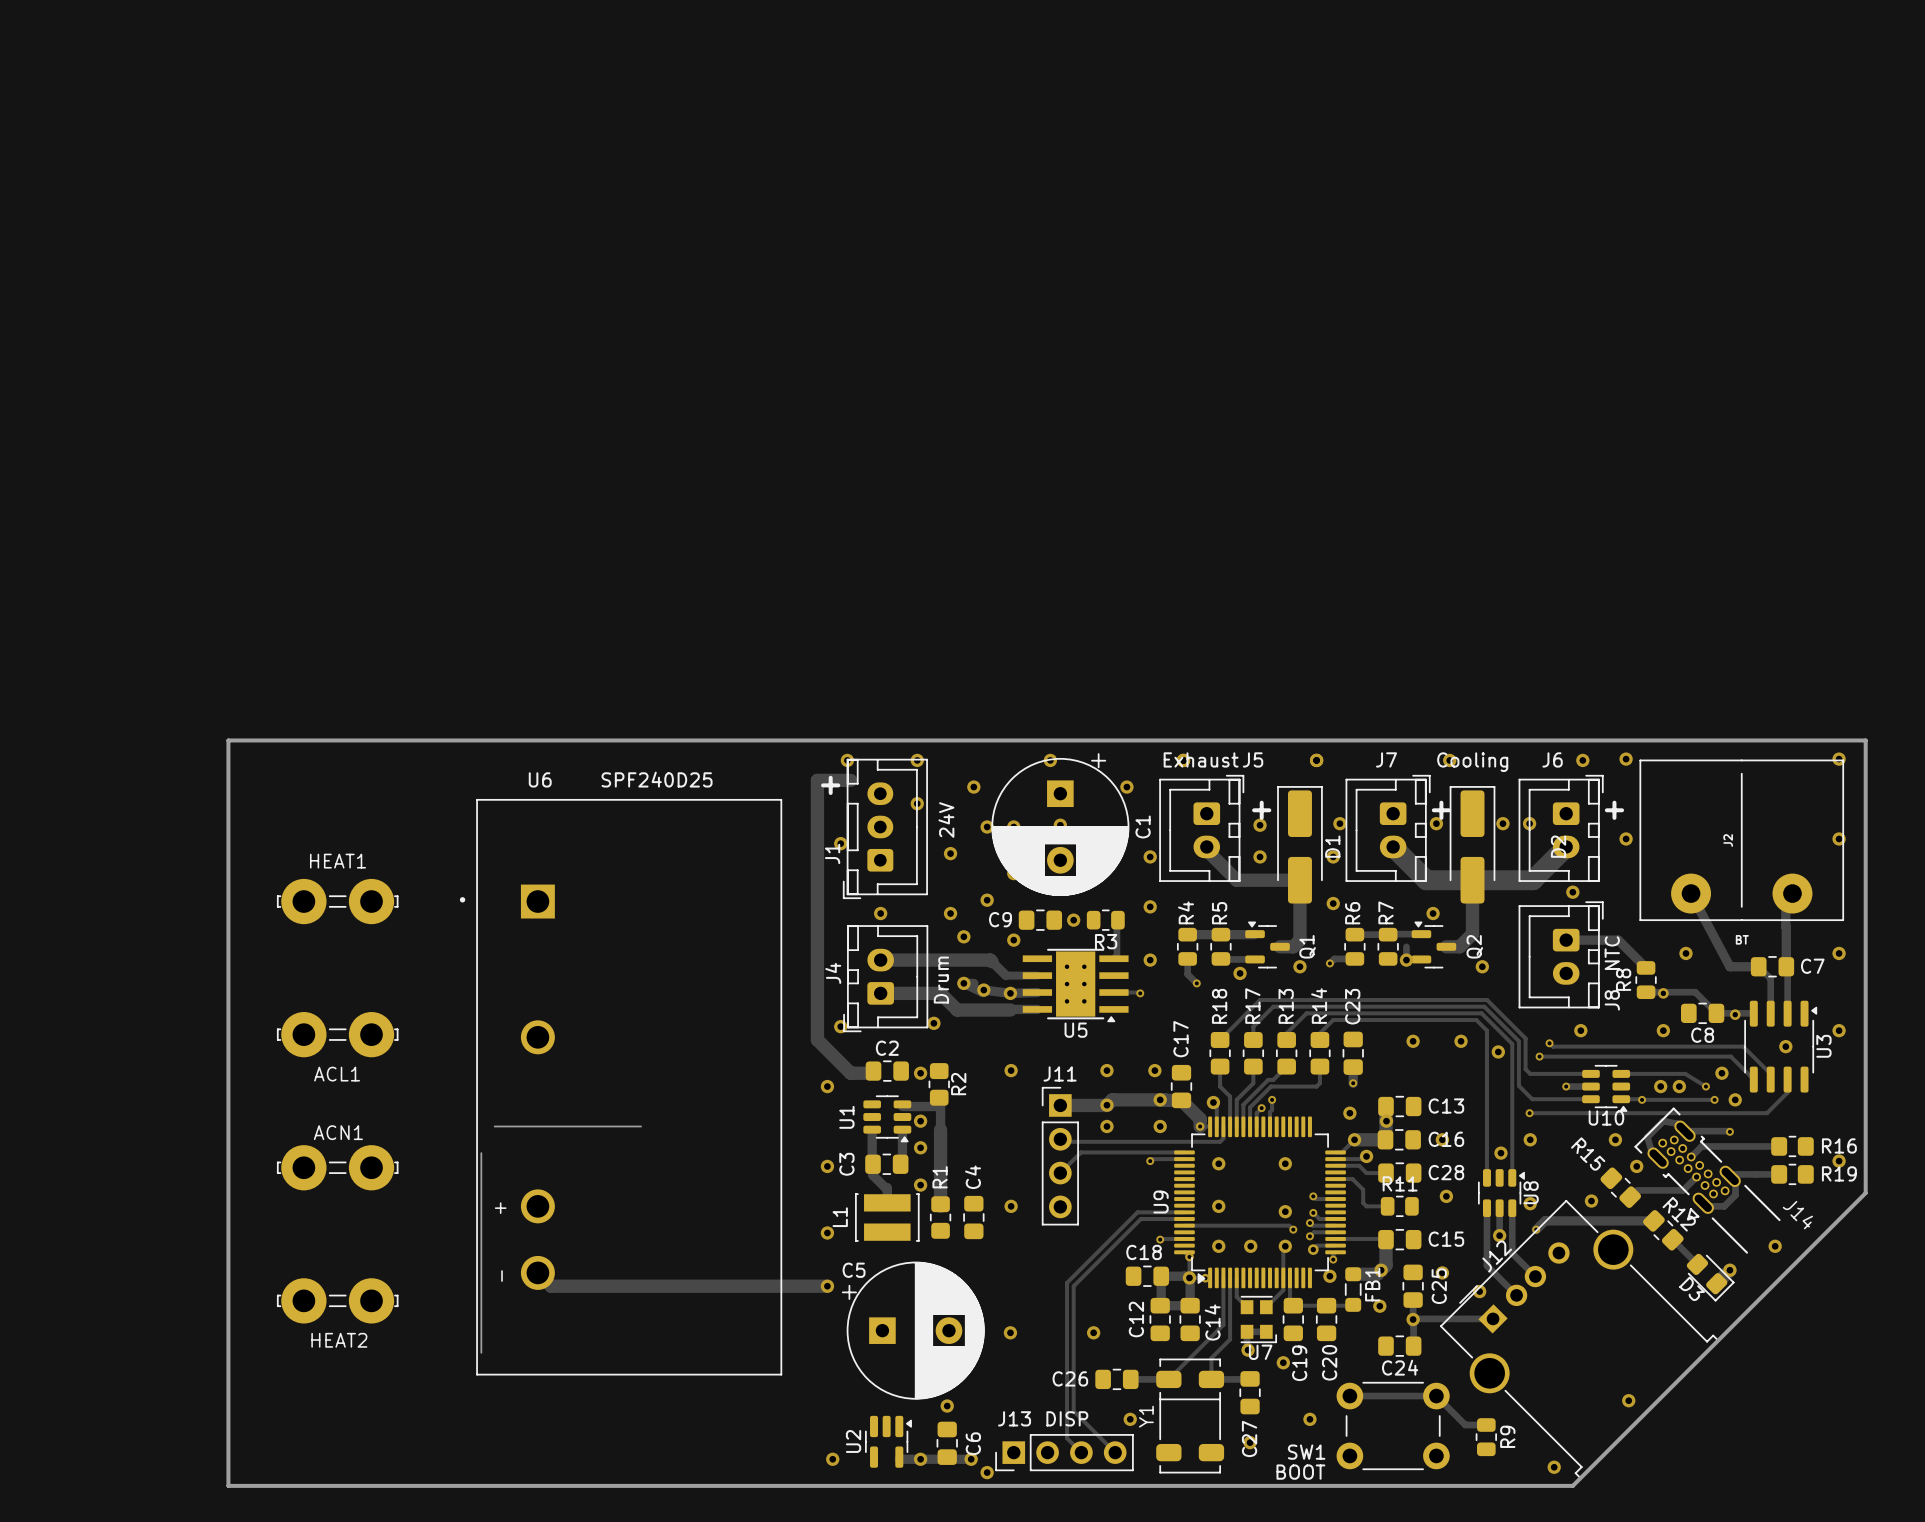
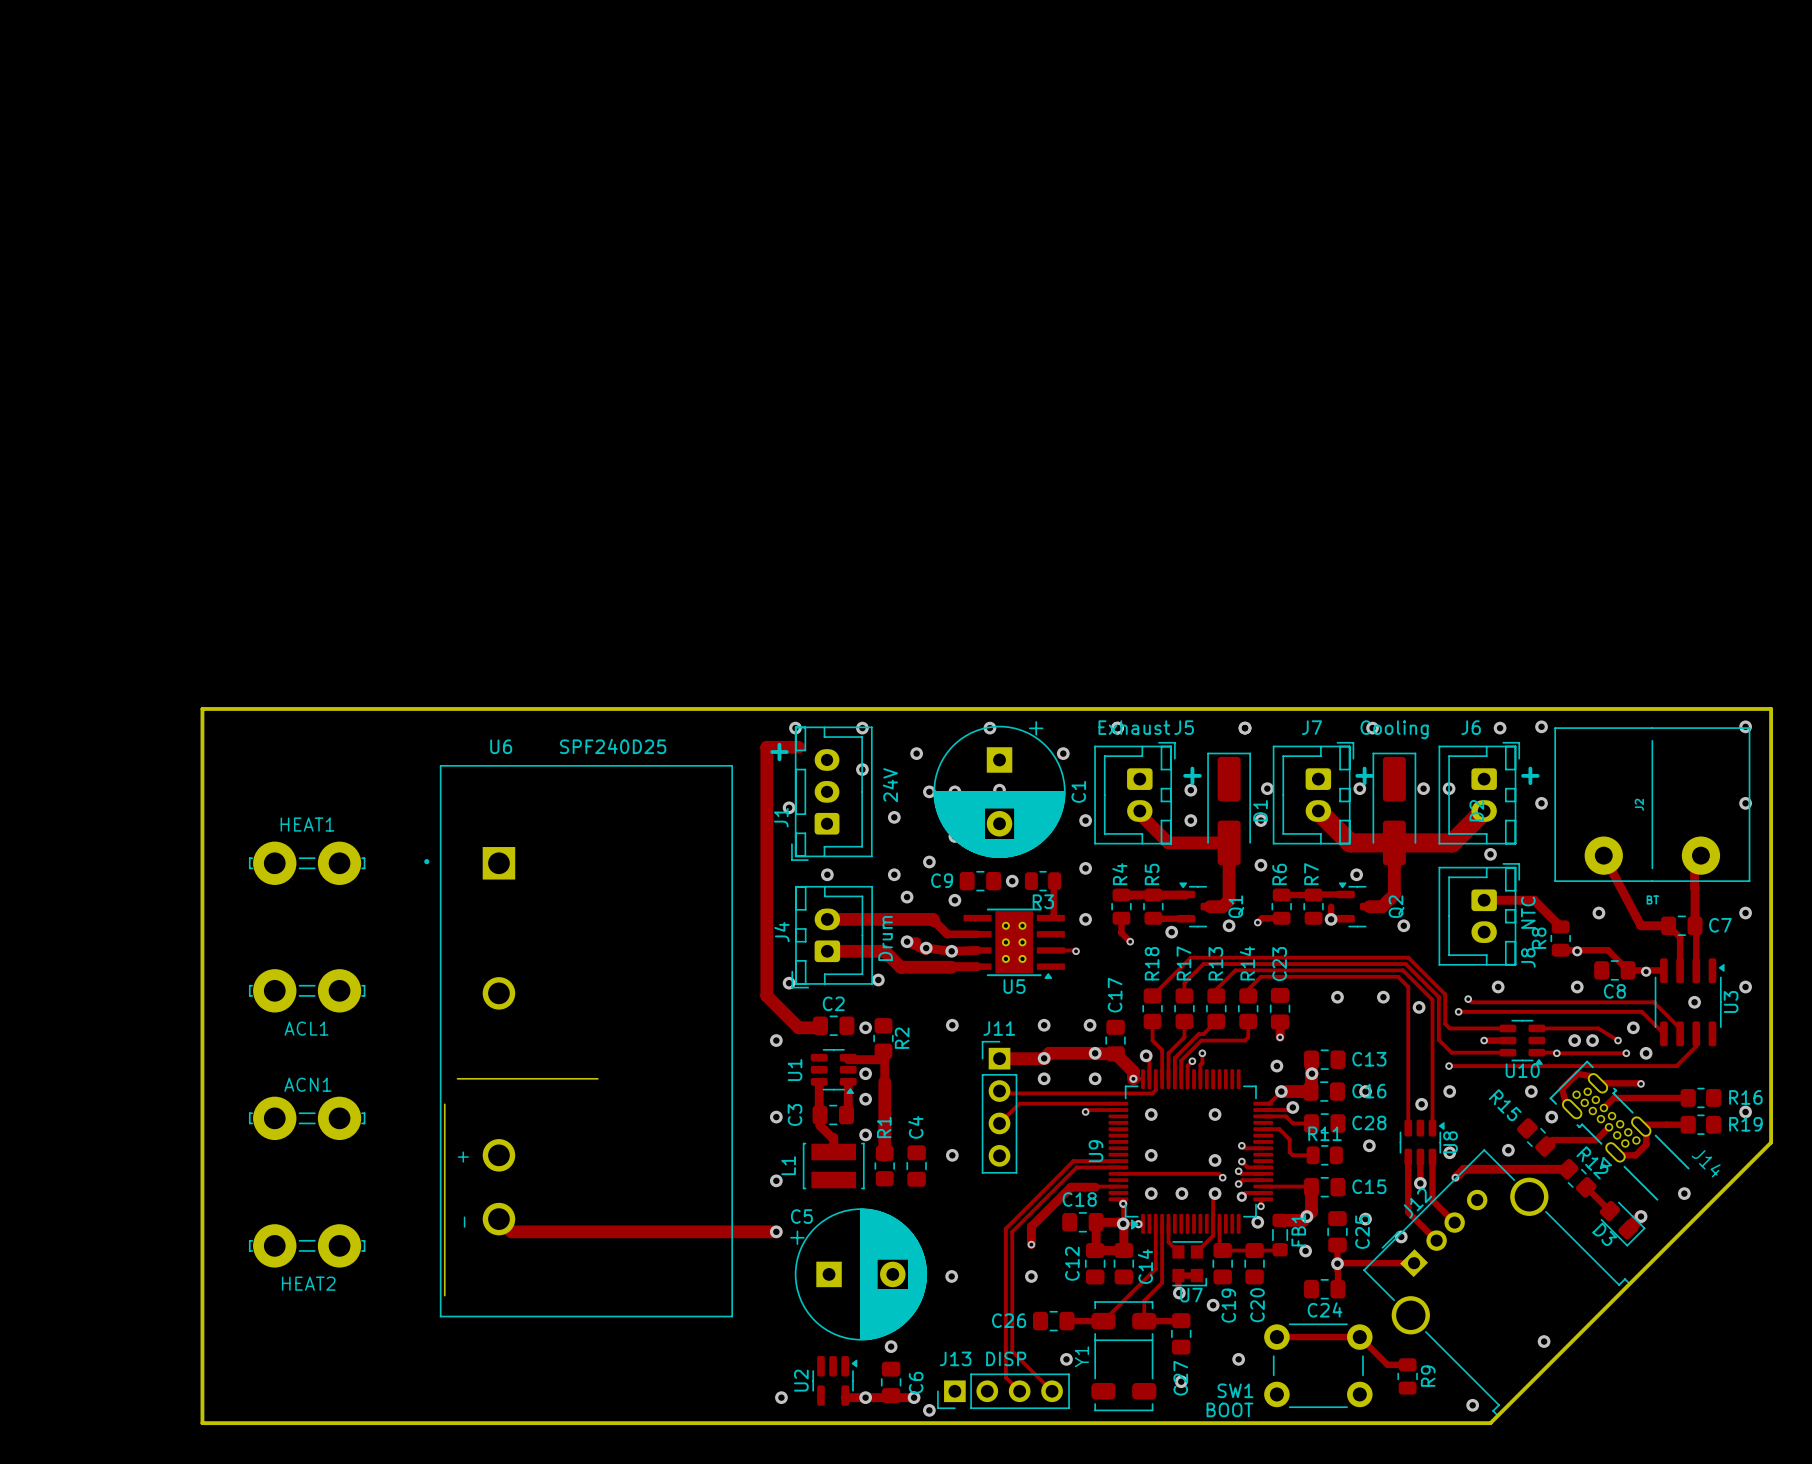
track: none -> (1095, 1187) (1070, 1187) (1031, 1226) (1031, 1244)
via: (1160, 1239) -> none
via: none -> (1031, 1244)

